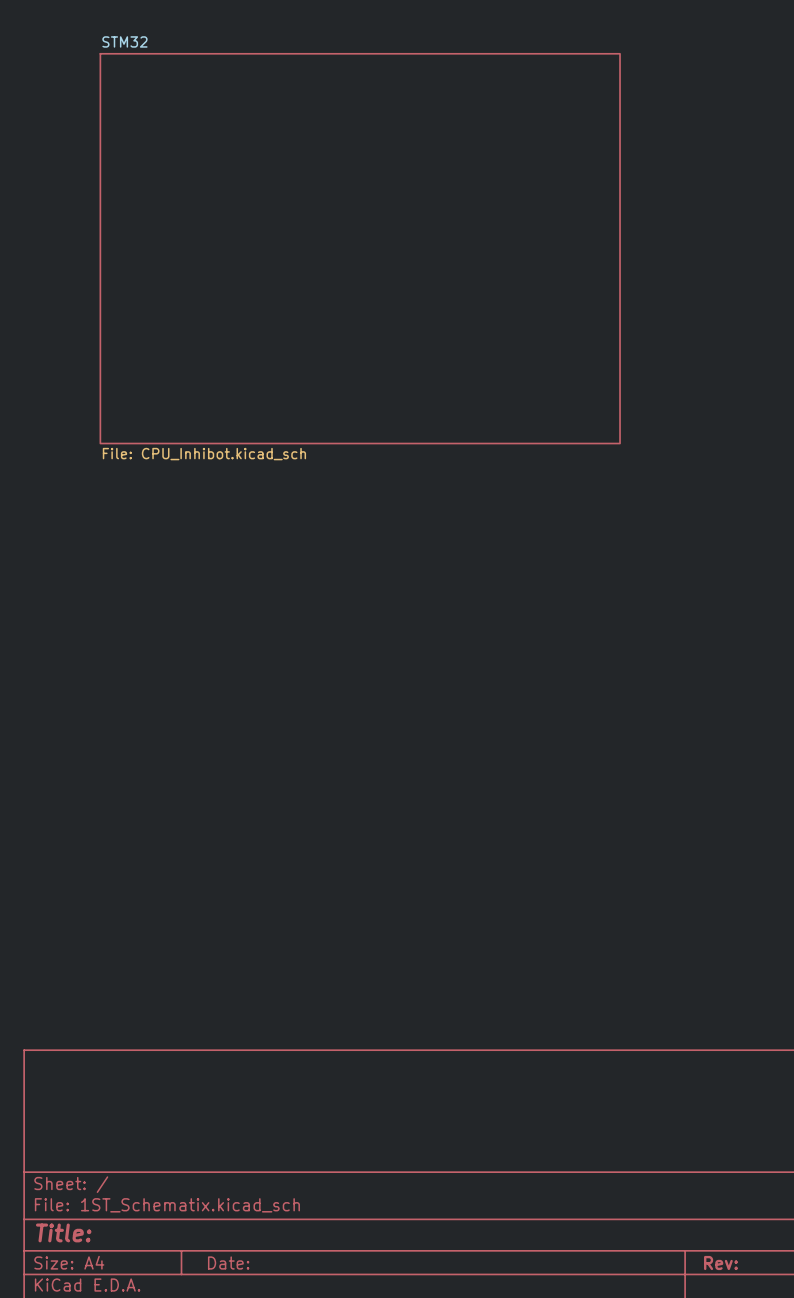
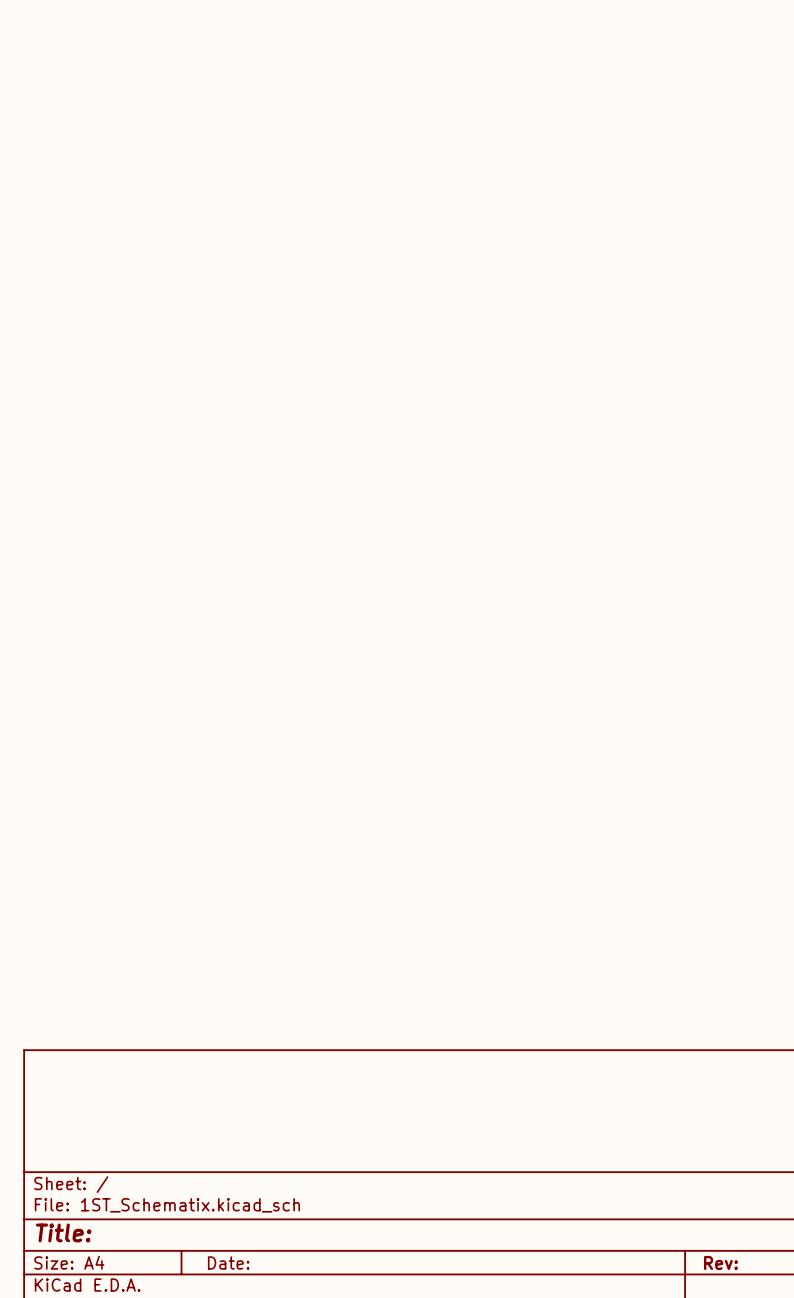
sheet STM32: File: CPU_Inhibot.kicad_sch (360, 248) -> none

